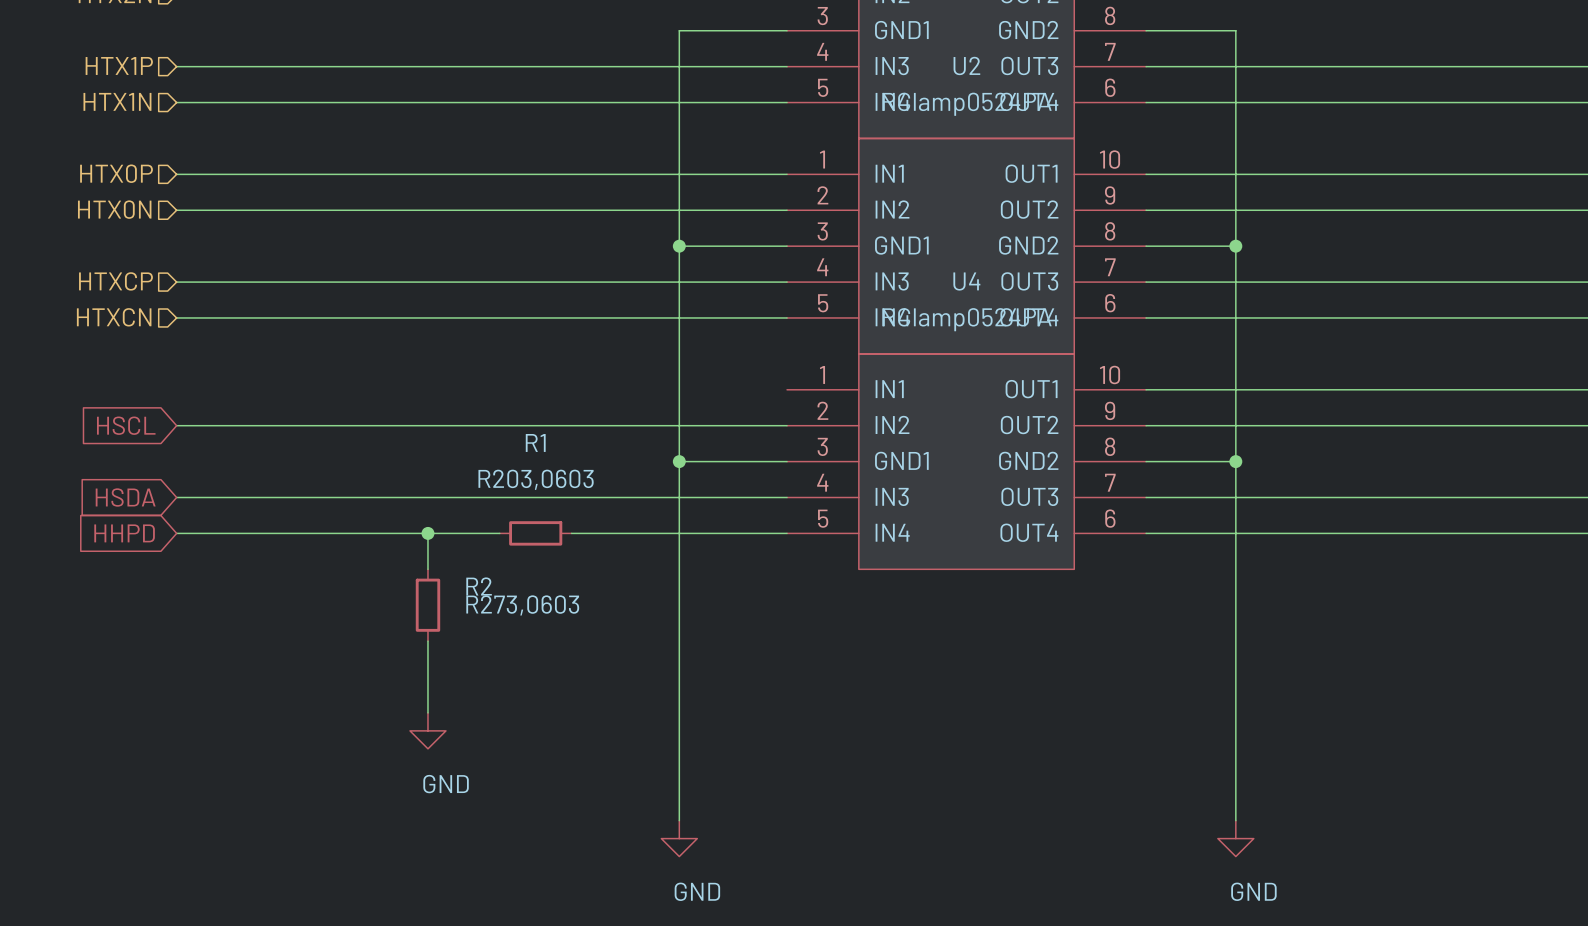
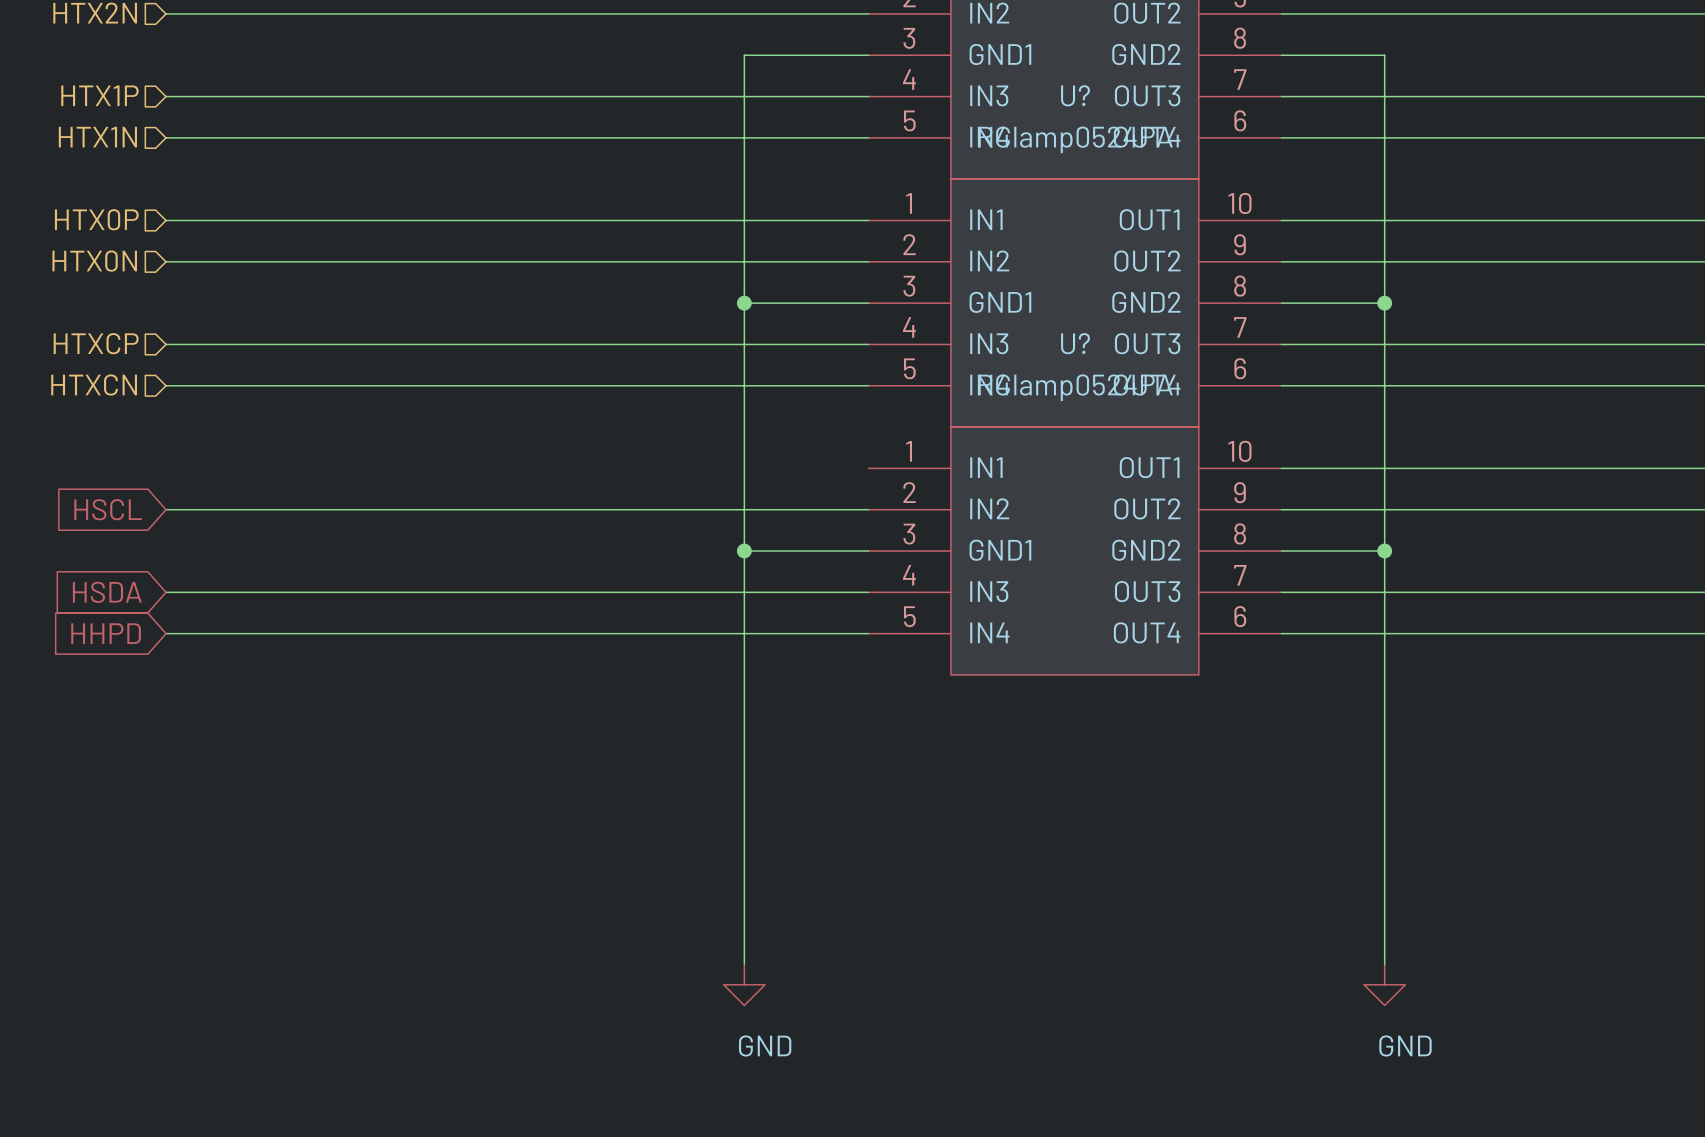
U2 name: U2 (966, 65) -> U? (1075, 95)
U4 name: U4 (966, 281) -> U? (1075, 343)
wire: (427, 533) (427, 569) -> none
junction: (427, 533) -> none
wire: none -> (537, 633) (620, 633)
R1: R203,0603 (535, 533) -> none
R2: R273,0603 (427, 605) -> none
wire: (427, 641) (427, 712) -> none
power symbol: GND (427, 730) -> none

